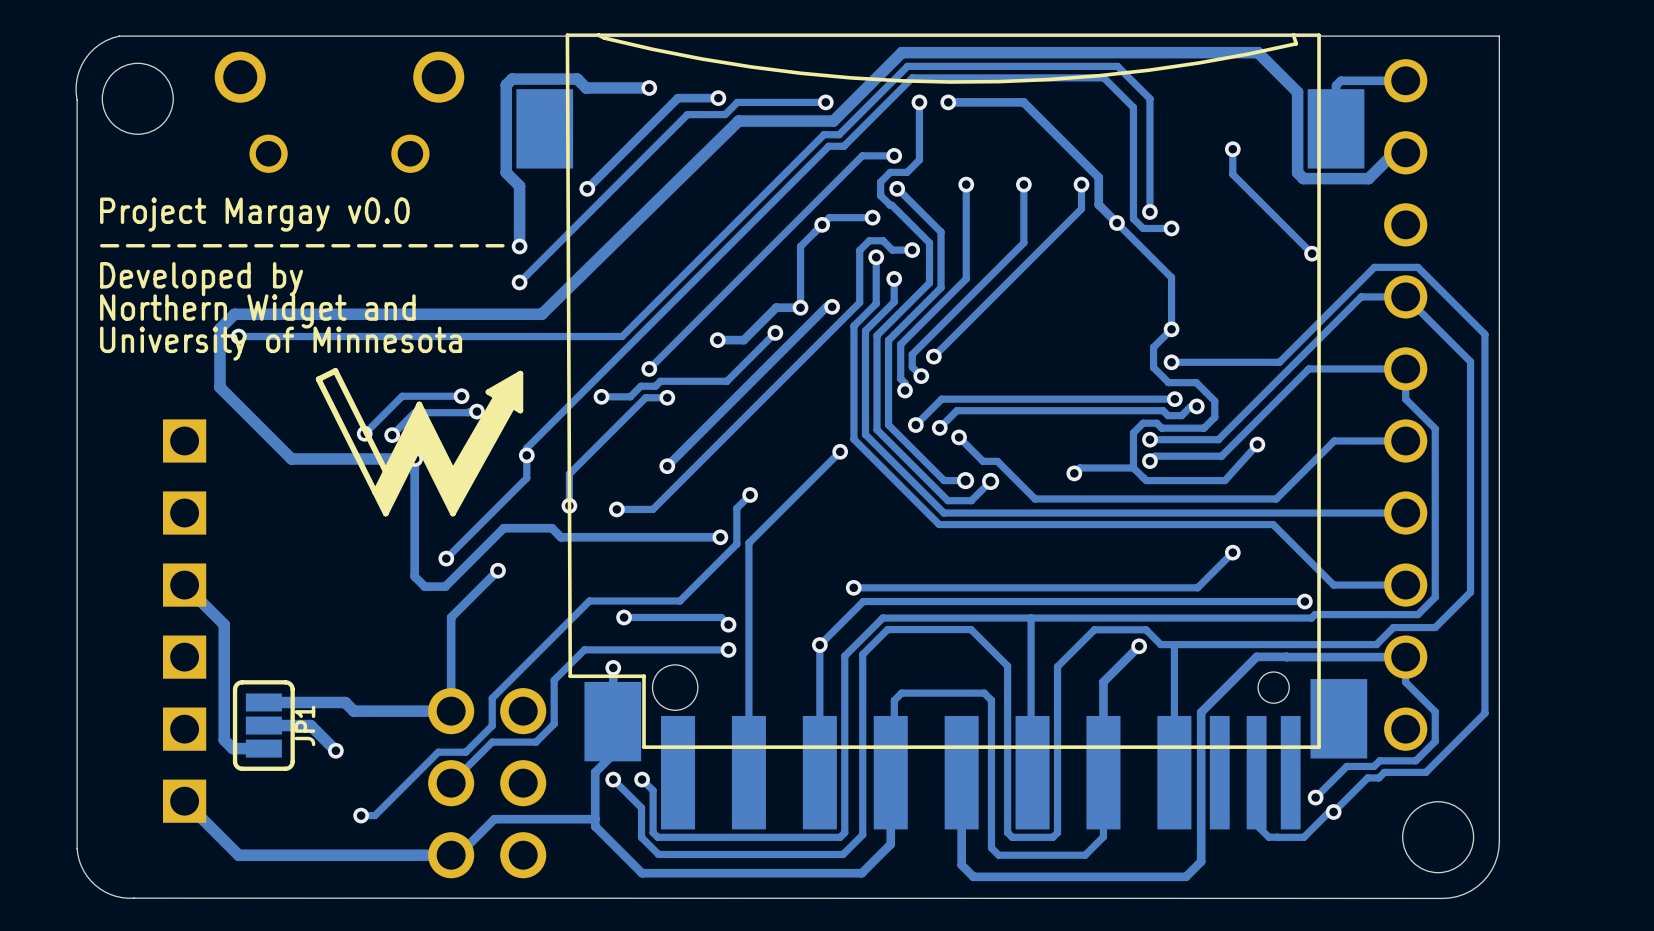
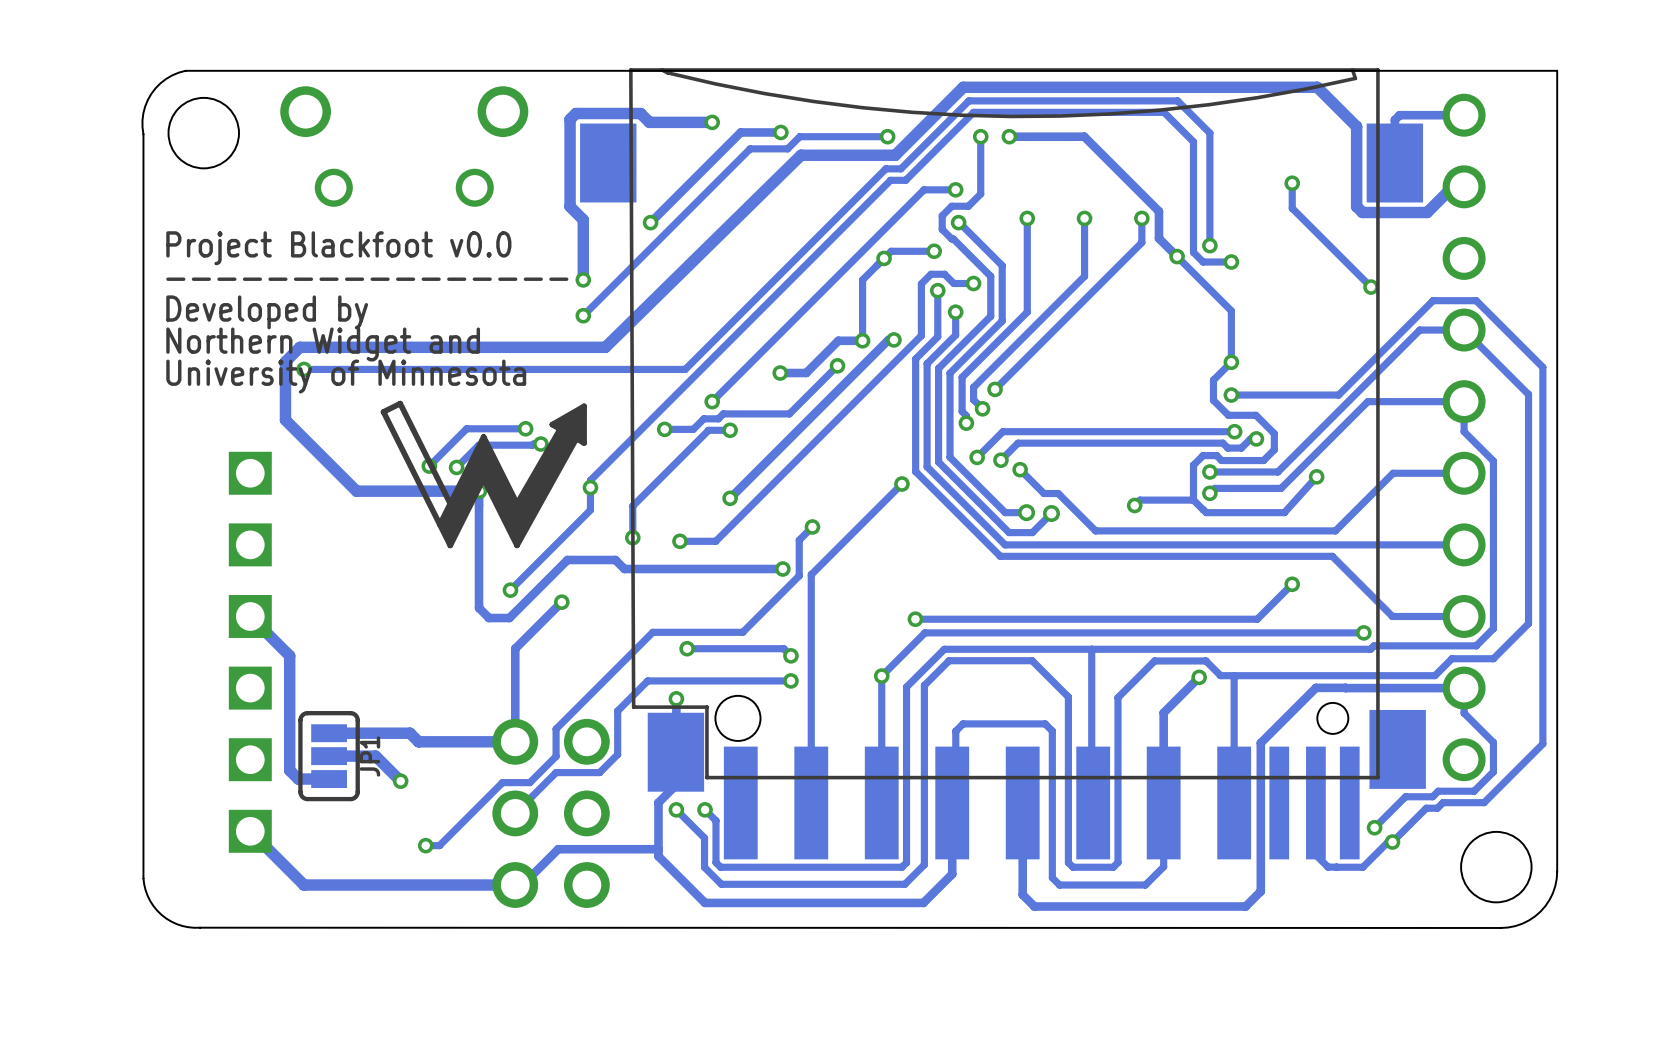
text: Project Margay v0.0 (254, 214) -> Project Blackfoot v0.0 (338, 248)

